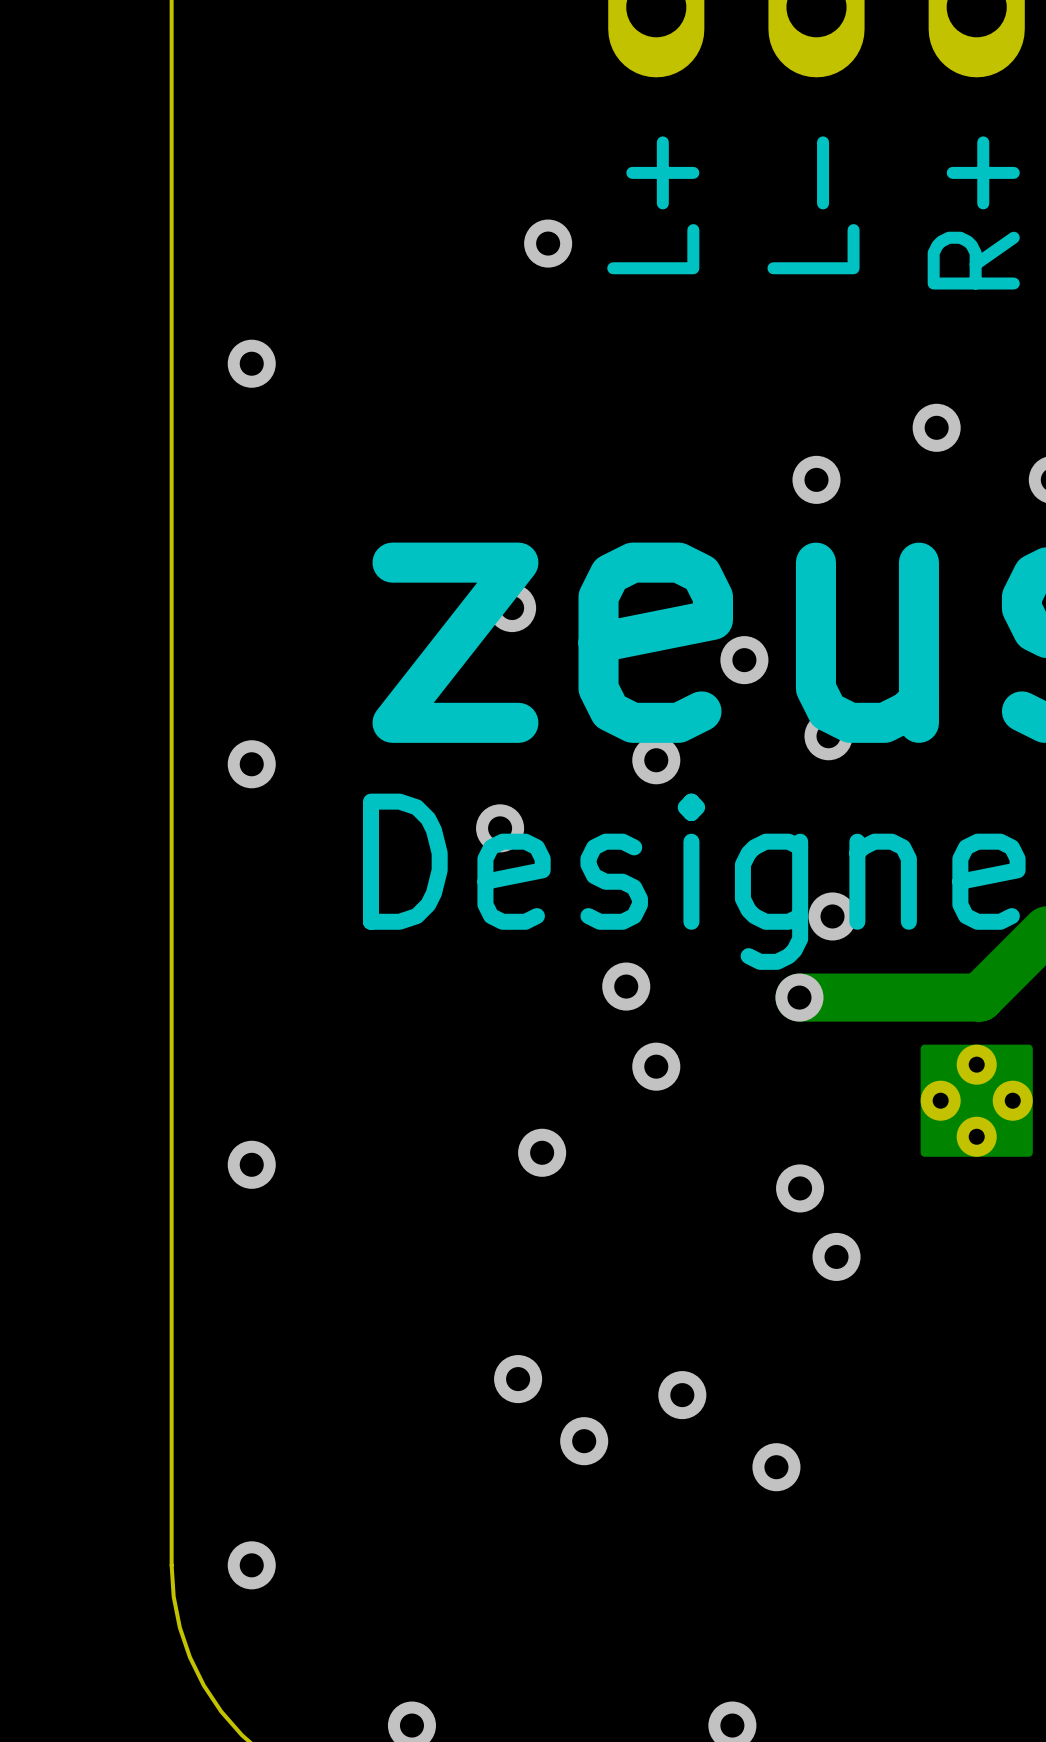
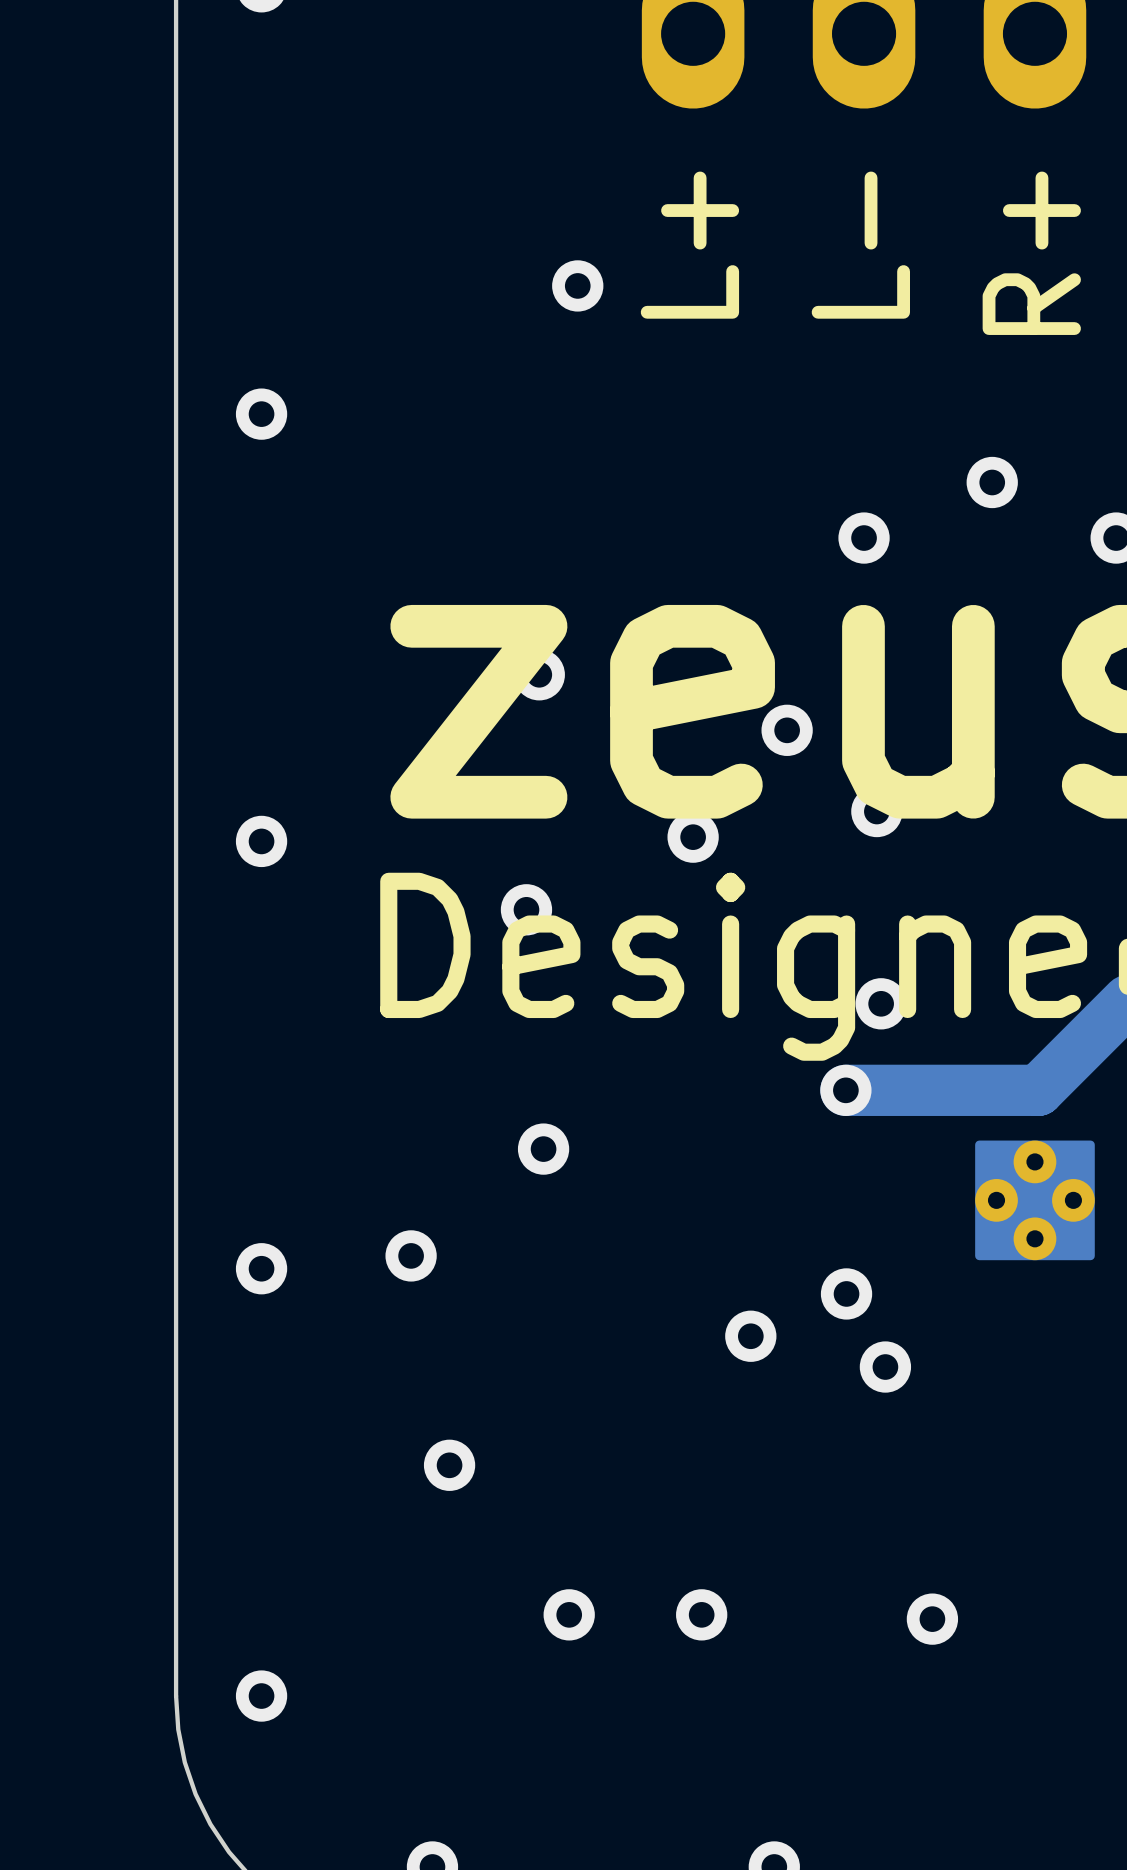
via: (626, 986) -> none
via: none -> (543, 1149)
via: (656, 1066) -> none
via: none -> (411, 1255)
via: (542, 1152) -> none
via: none -> (750, 1336)
via: none -> (449, 1465)
via: (518, 1379) -> none
via: (682, 1395) -> none
via position: (584, 1441) -> (569, 1614)
via: (776, 1467) -> none
via: none -> (701, 1614)
via: none -> (932, 1619)

